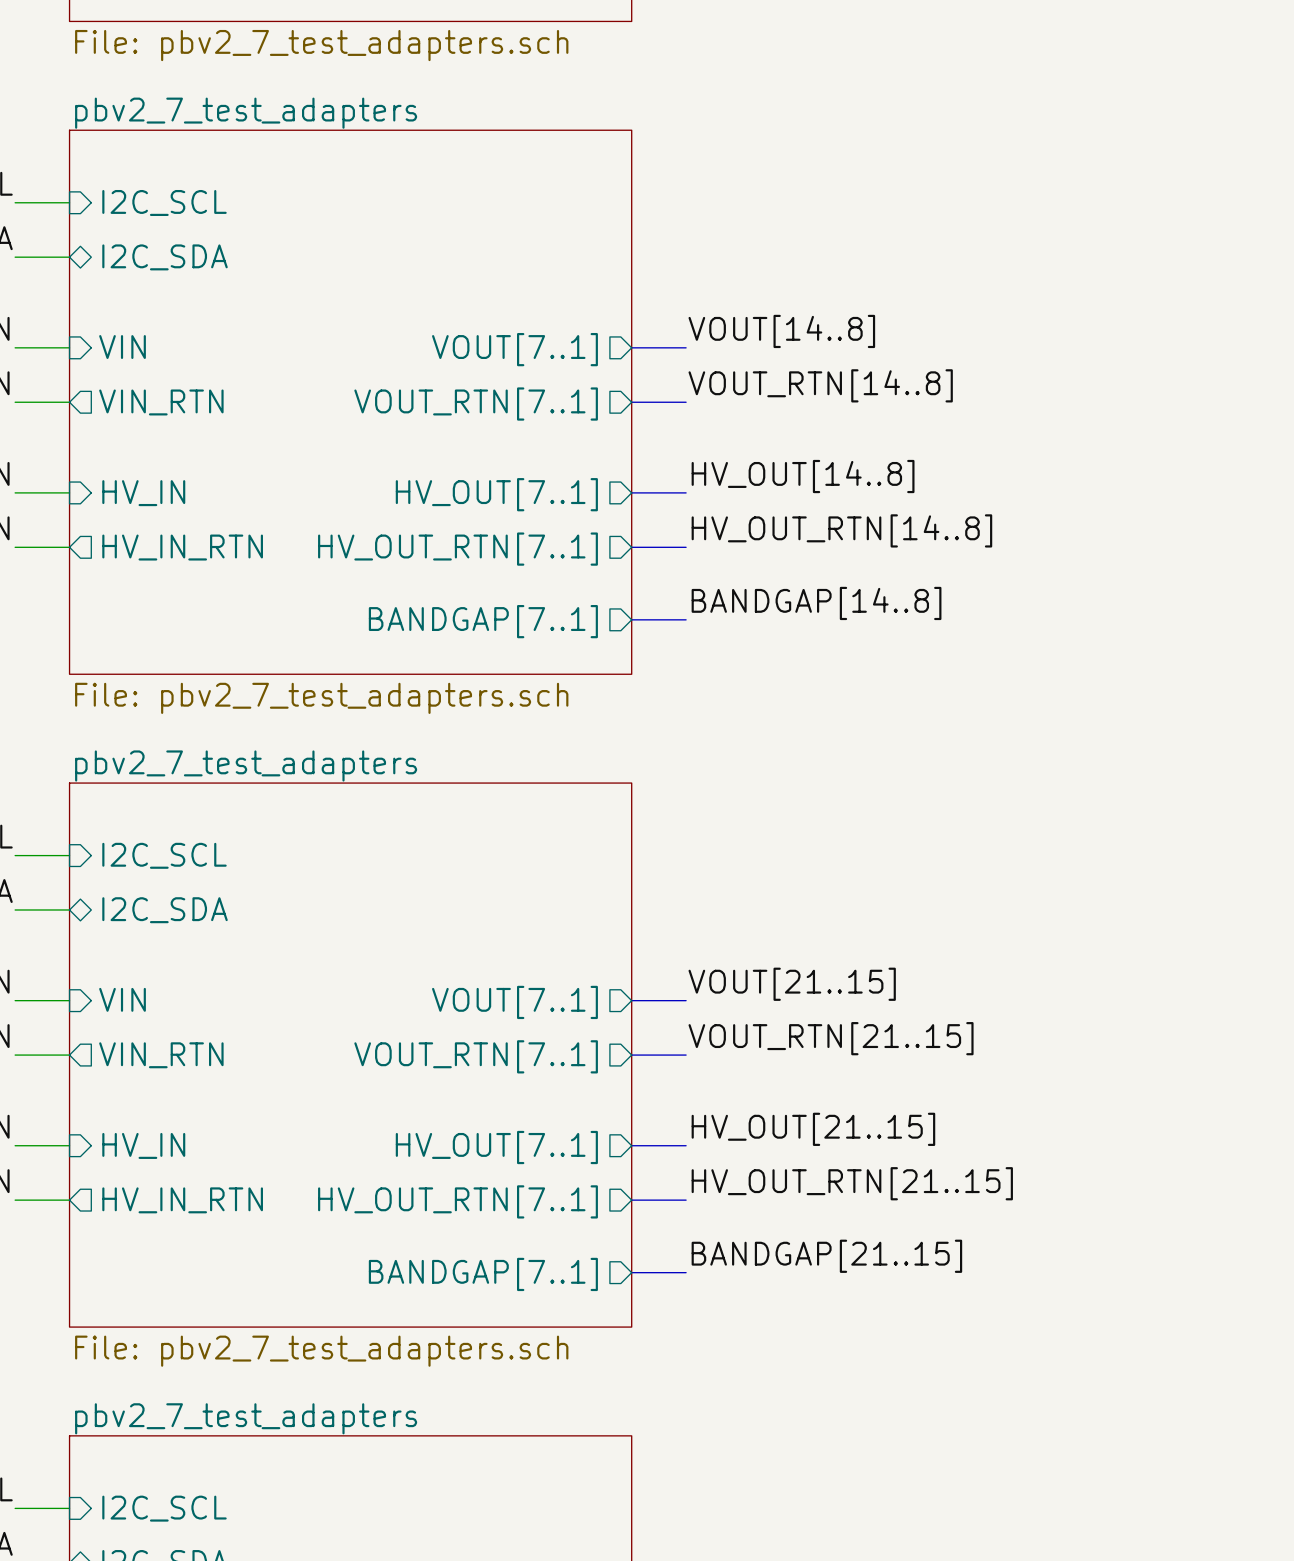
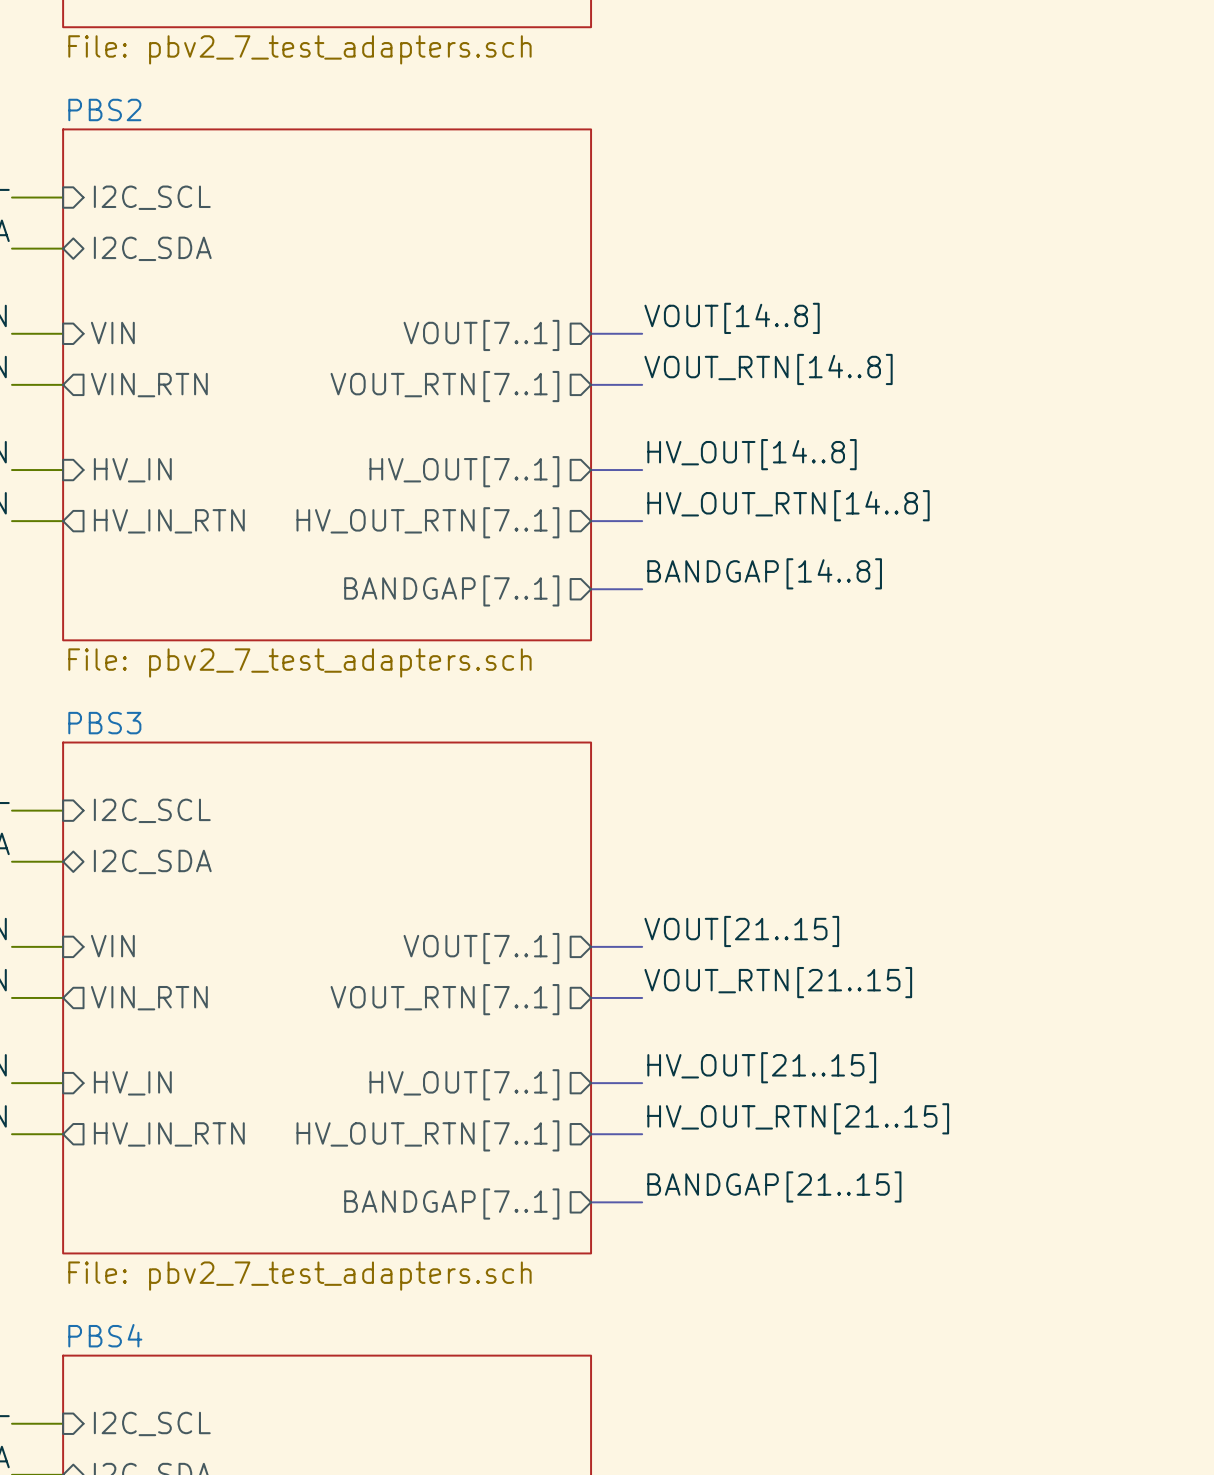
sheet pbv2_7_test_adapters name: pbv2_7_test_adapters (246, 113) -> PBS2 (104, 109)
sheet pbv2_7_test_adapters name: pbv2_7_test_adapters (246, 765) -> PBS3 (104, 723)
sheet pbv2_7_test_adapters name: pbv2_7_test_adapters (246, 1418) -> PBS4 (105, 1335)

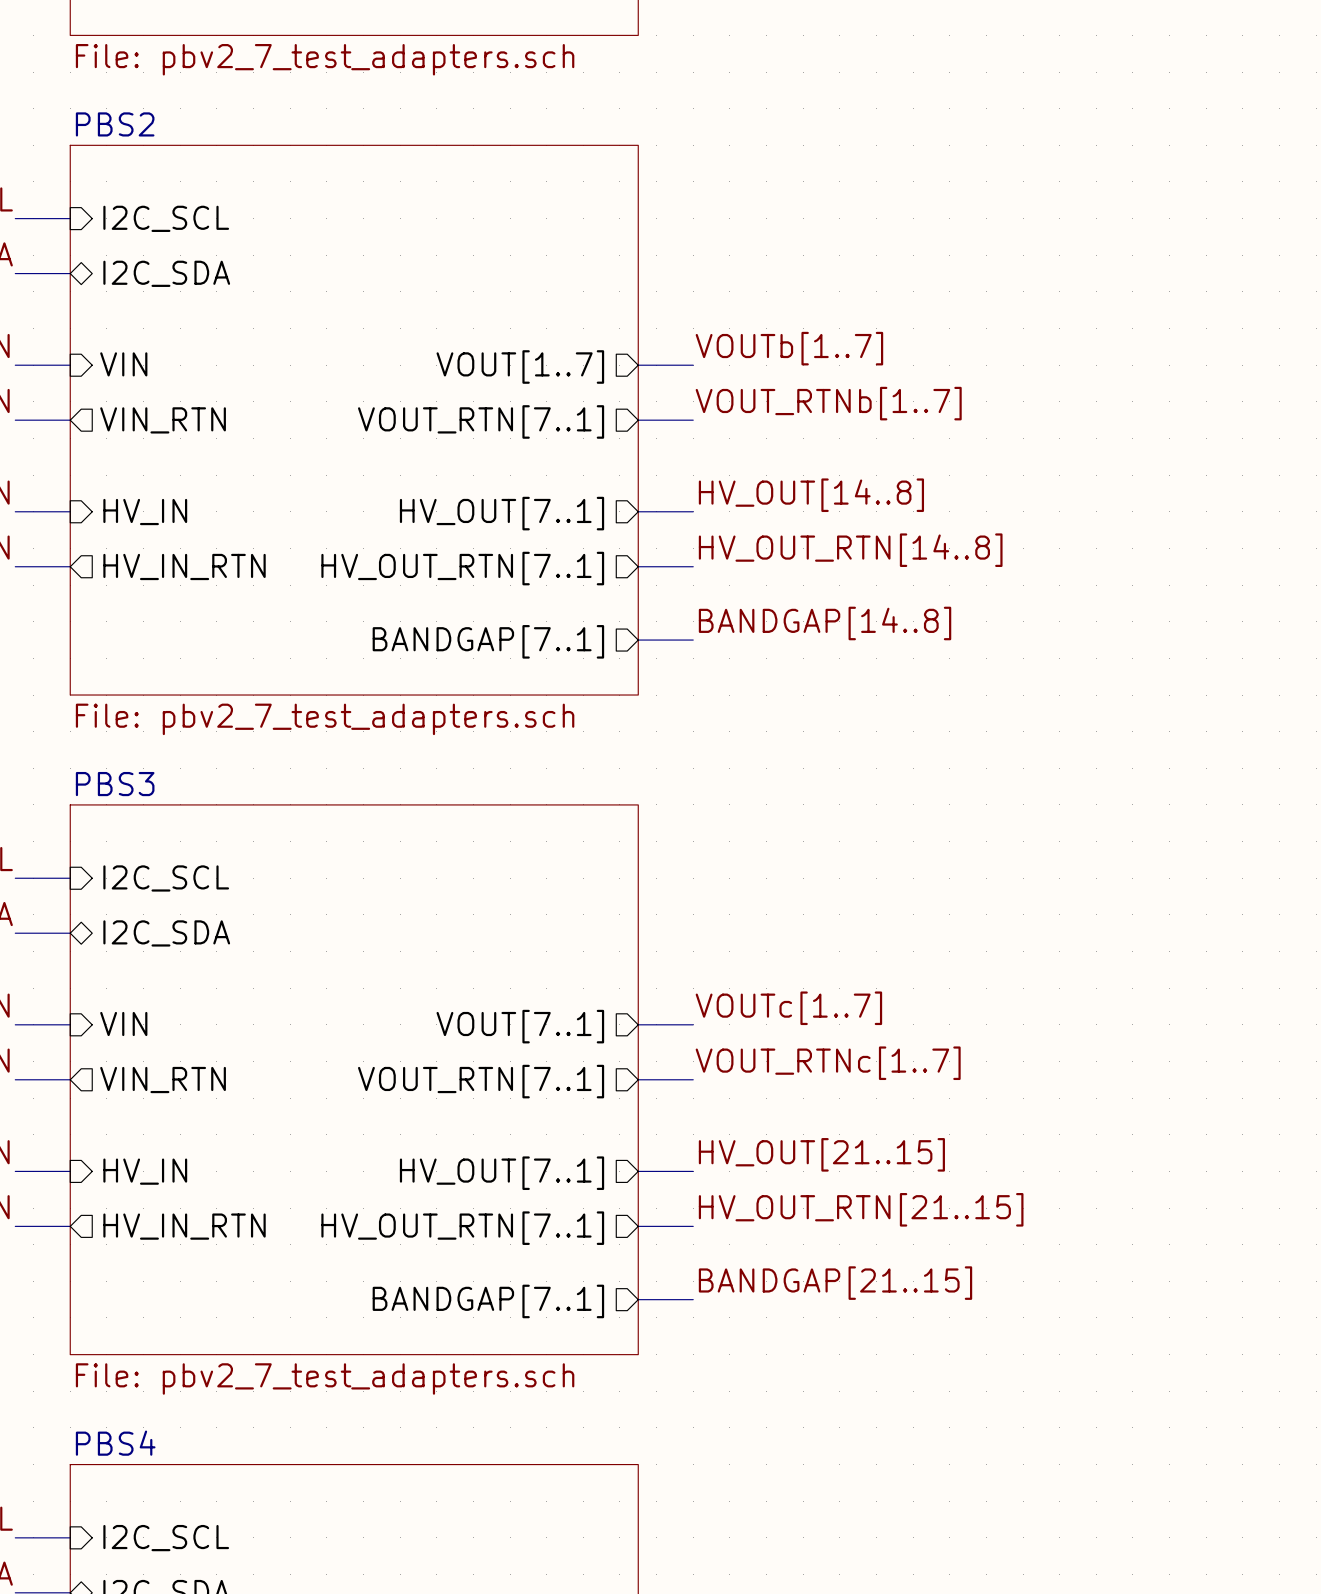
label: VOUT[14..8] (732, 318) -> VOUTb[1..7] (789, 348)
sheet pin: VOUT[7..1] (481, 335) -> VOUT[1..7] (520, 367)
label: VOUT_RTN[14..8] (768, 369) -> VOUT_RTNb[1..7] (828, 403)
label: VOUT[21..15] (741, 931) -> VOUTc[1..7] (788, 1008)
label: VOUT_RTN[21..15] (778, 982) -> VOUT_RTNc[1..7] (828, 1063)

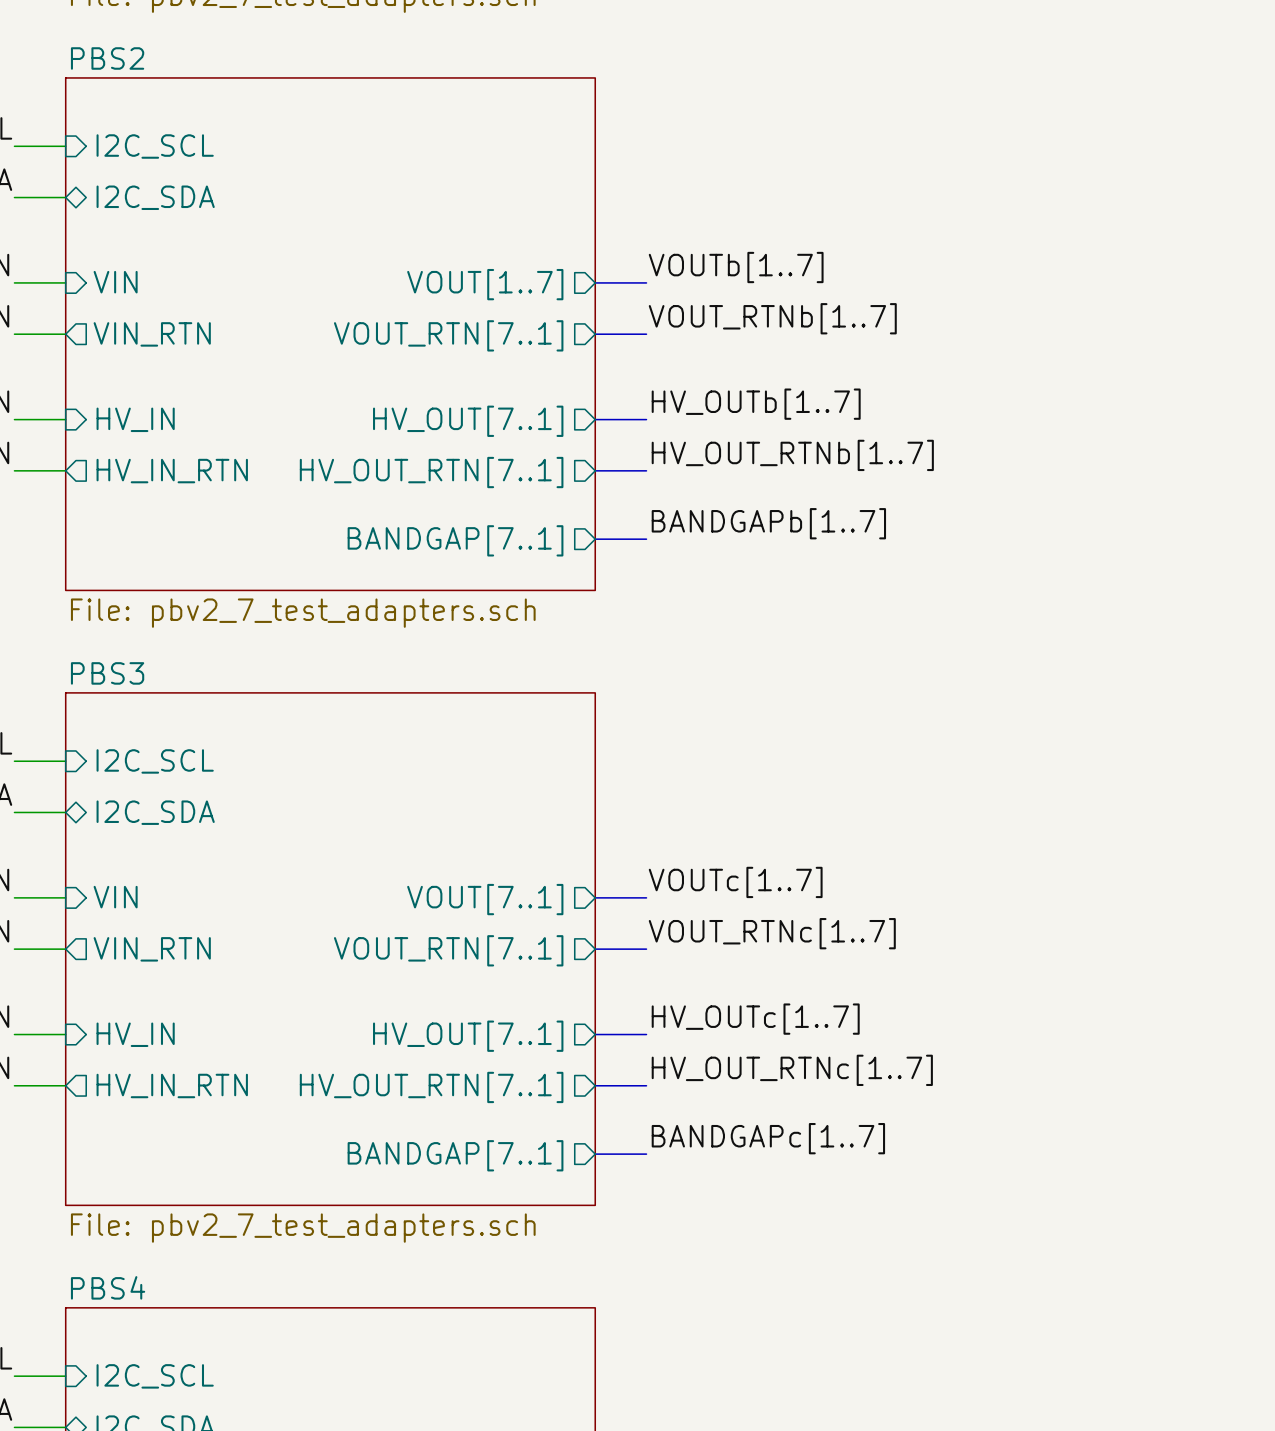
label: HV_OUT[14..8] (811, 495) -> HV_OUTb[1..7] (756, 404)
label: HV_OUT_RTN[14..8] (850, 550) -> HV_OUT_RTNb[1..7] (792, 455)
label: BANDGAP[14..8] (825, 623) -> BANDGAPb[1..7] (768, 523)
label: HV_OUT[21..15] (821, 1154) -> HV_OUTc[1..7] (755, 1019)
label: HV_OUT_RTN[21..15] (861, 1209) -> HV_OUT_RTNc[1..7] (792, 1070)
label: BANDGAP[21..15] (835, 1283) -> BANDGAPc[1..7] (768, 1138)

